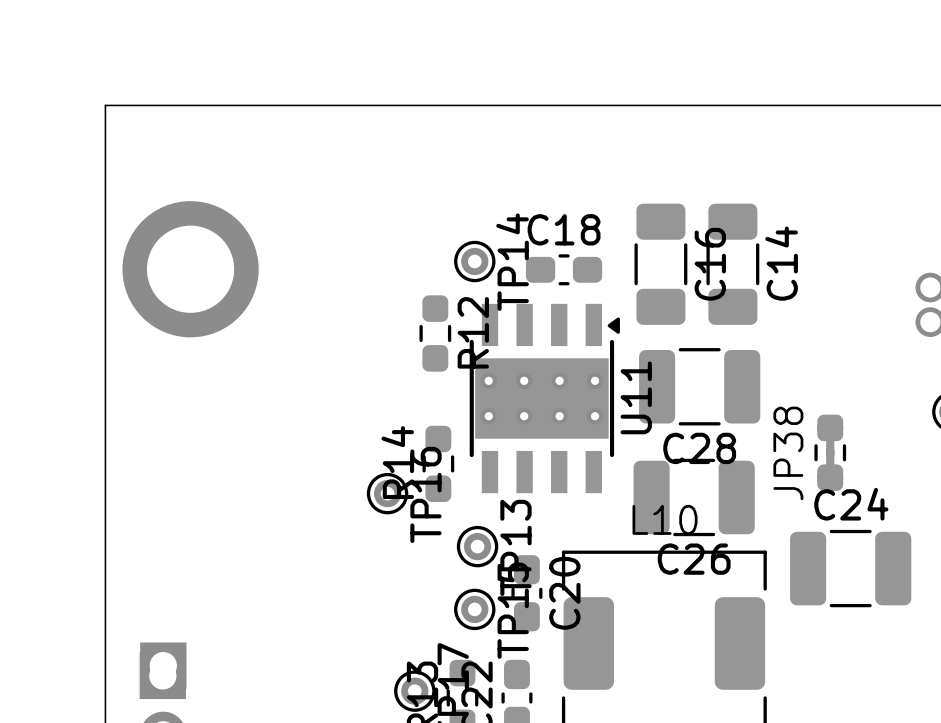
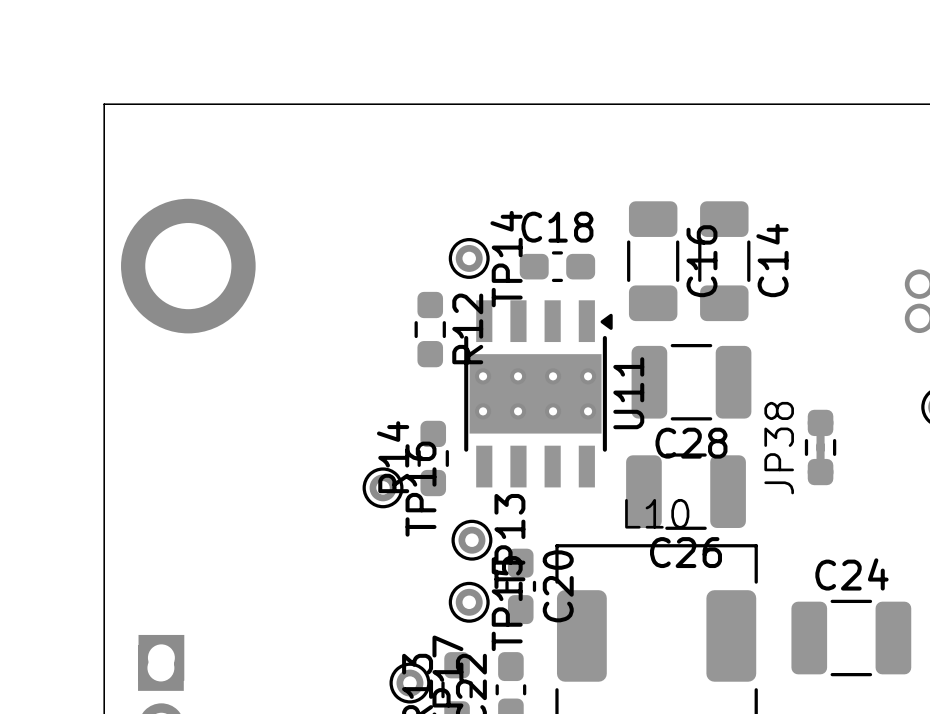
C24 position: (850, 568) -> (851, 638)

